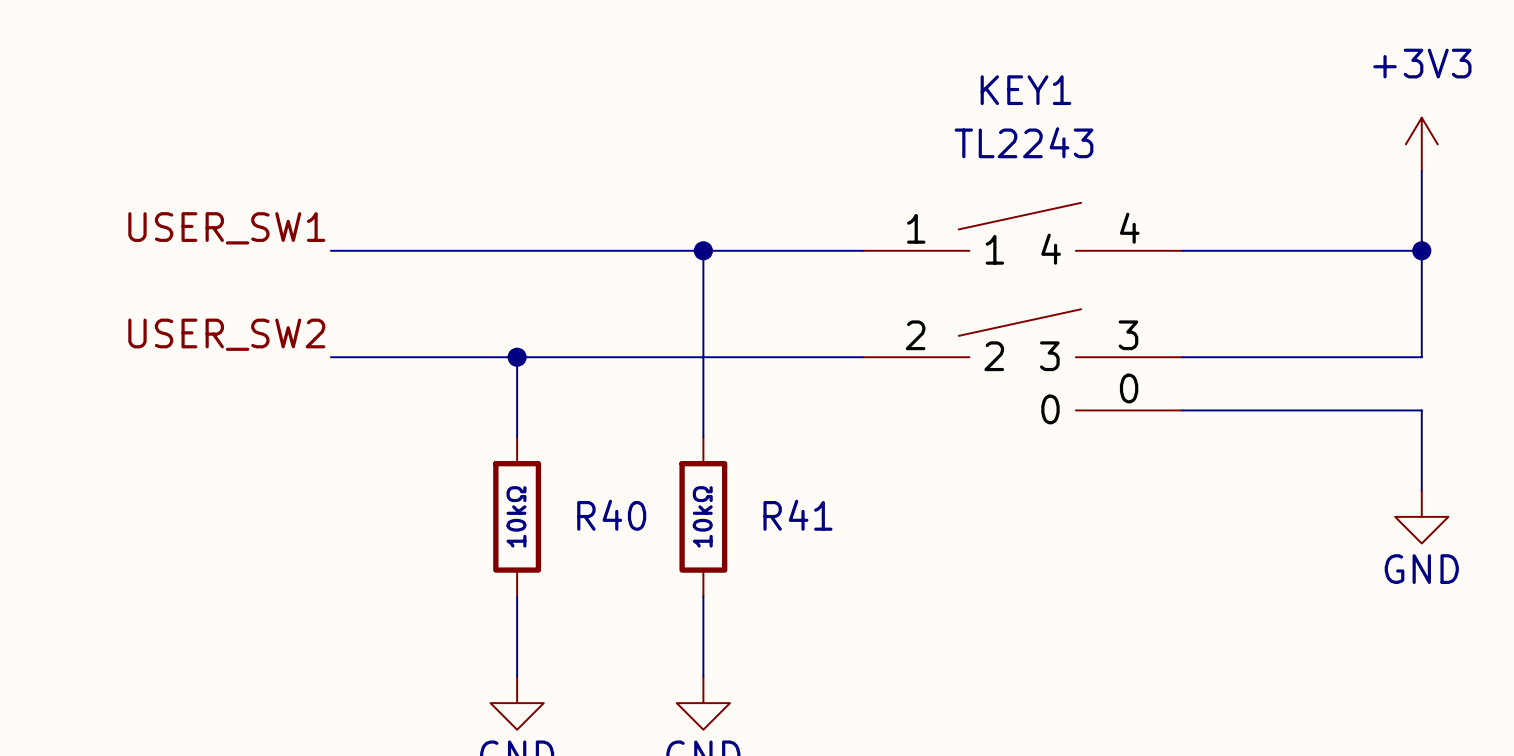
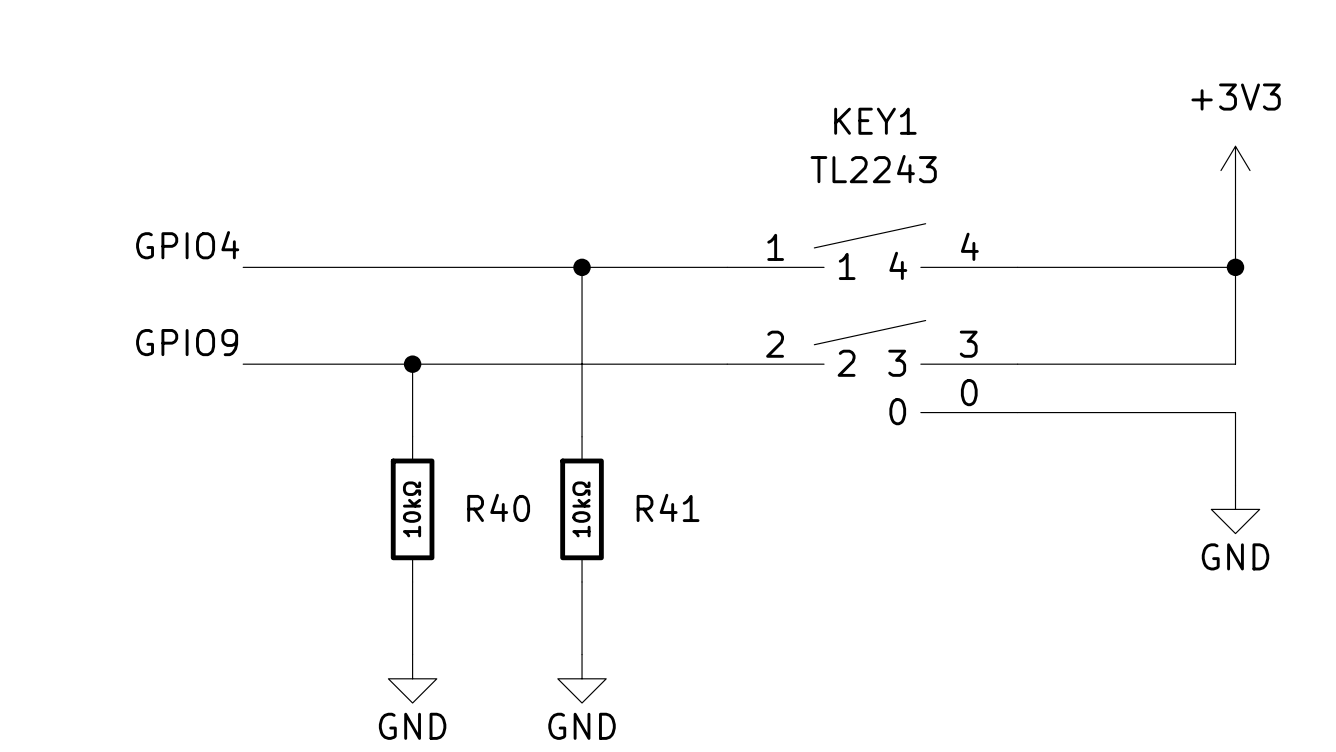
label: USER_SW1 (226, 228) -> GPIO4 (187, 245)
label: USER_SW2 (226, 334) -> GPIO9 (187, 342)

